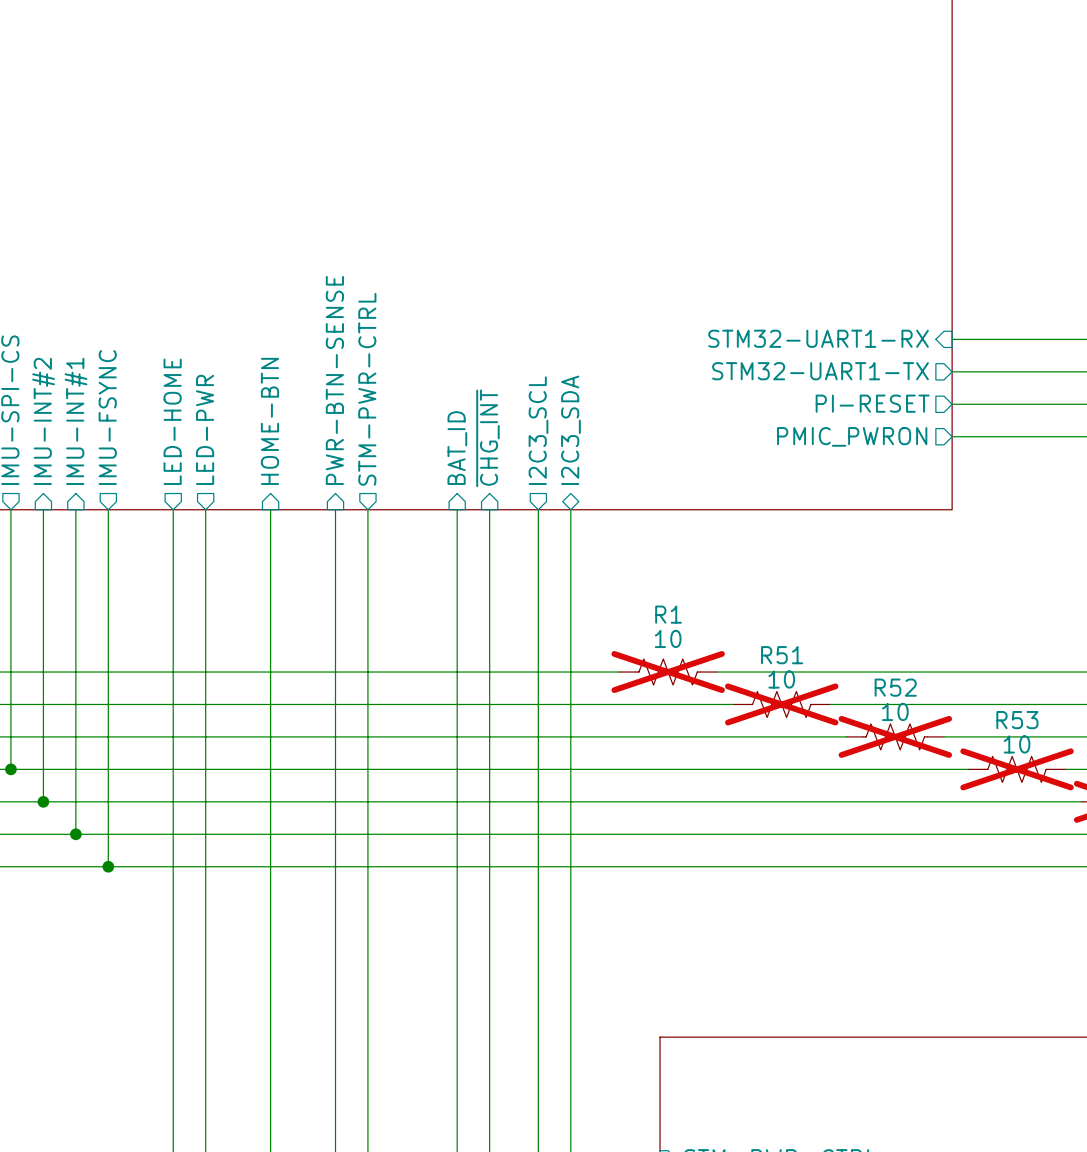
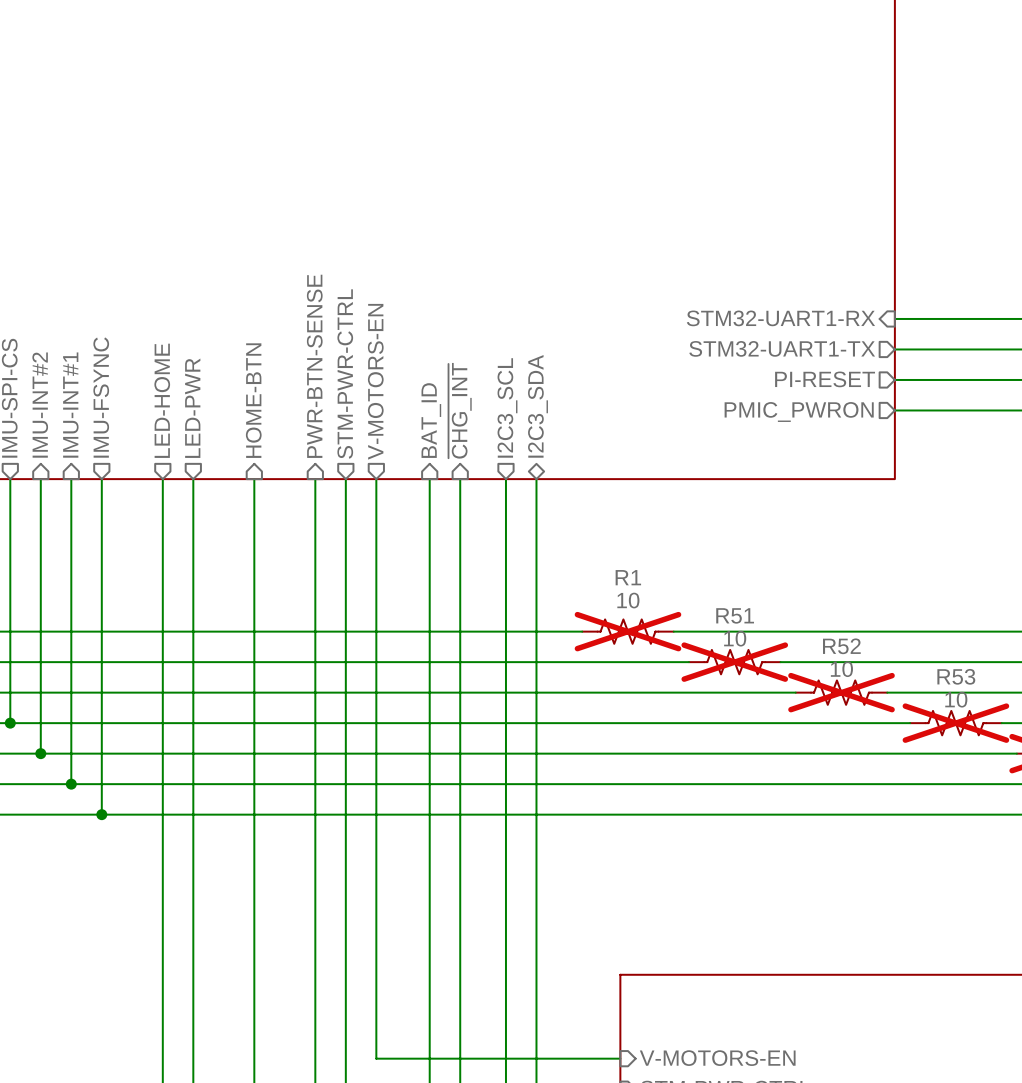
sheet pin: none -> V-MOTORS-EN (375, 381)
wire: none -> (376, 479) (376, 1058) (620, 1058)
sheet pin: none -> V-MOTORS-EN (717, 1058)

